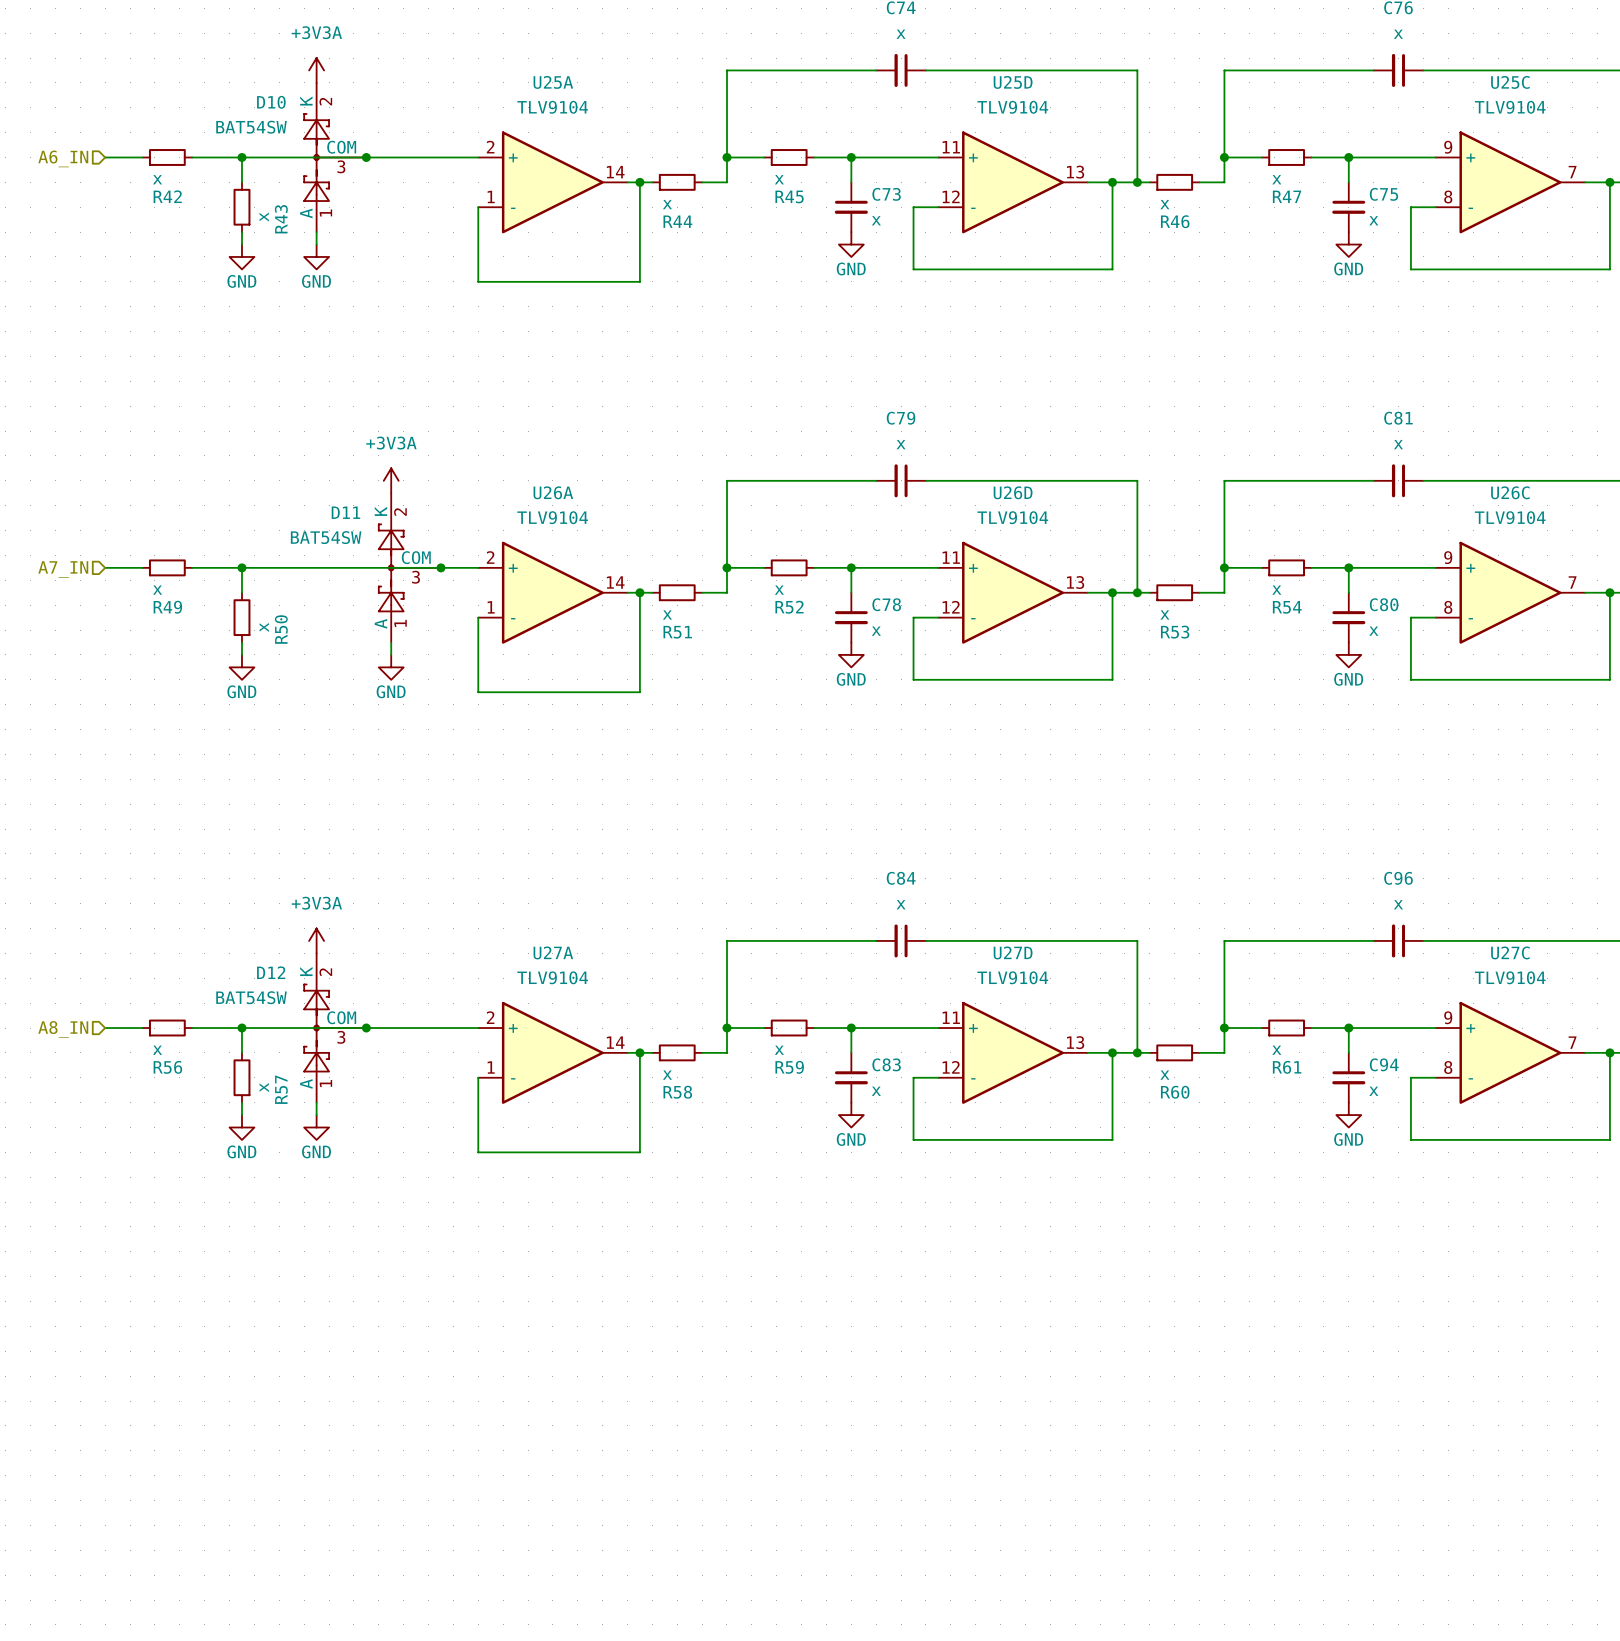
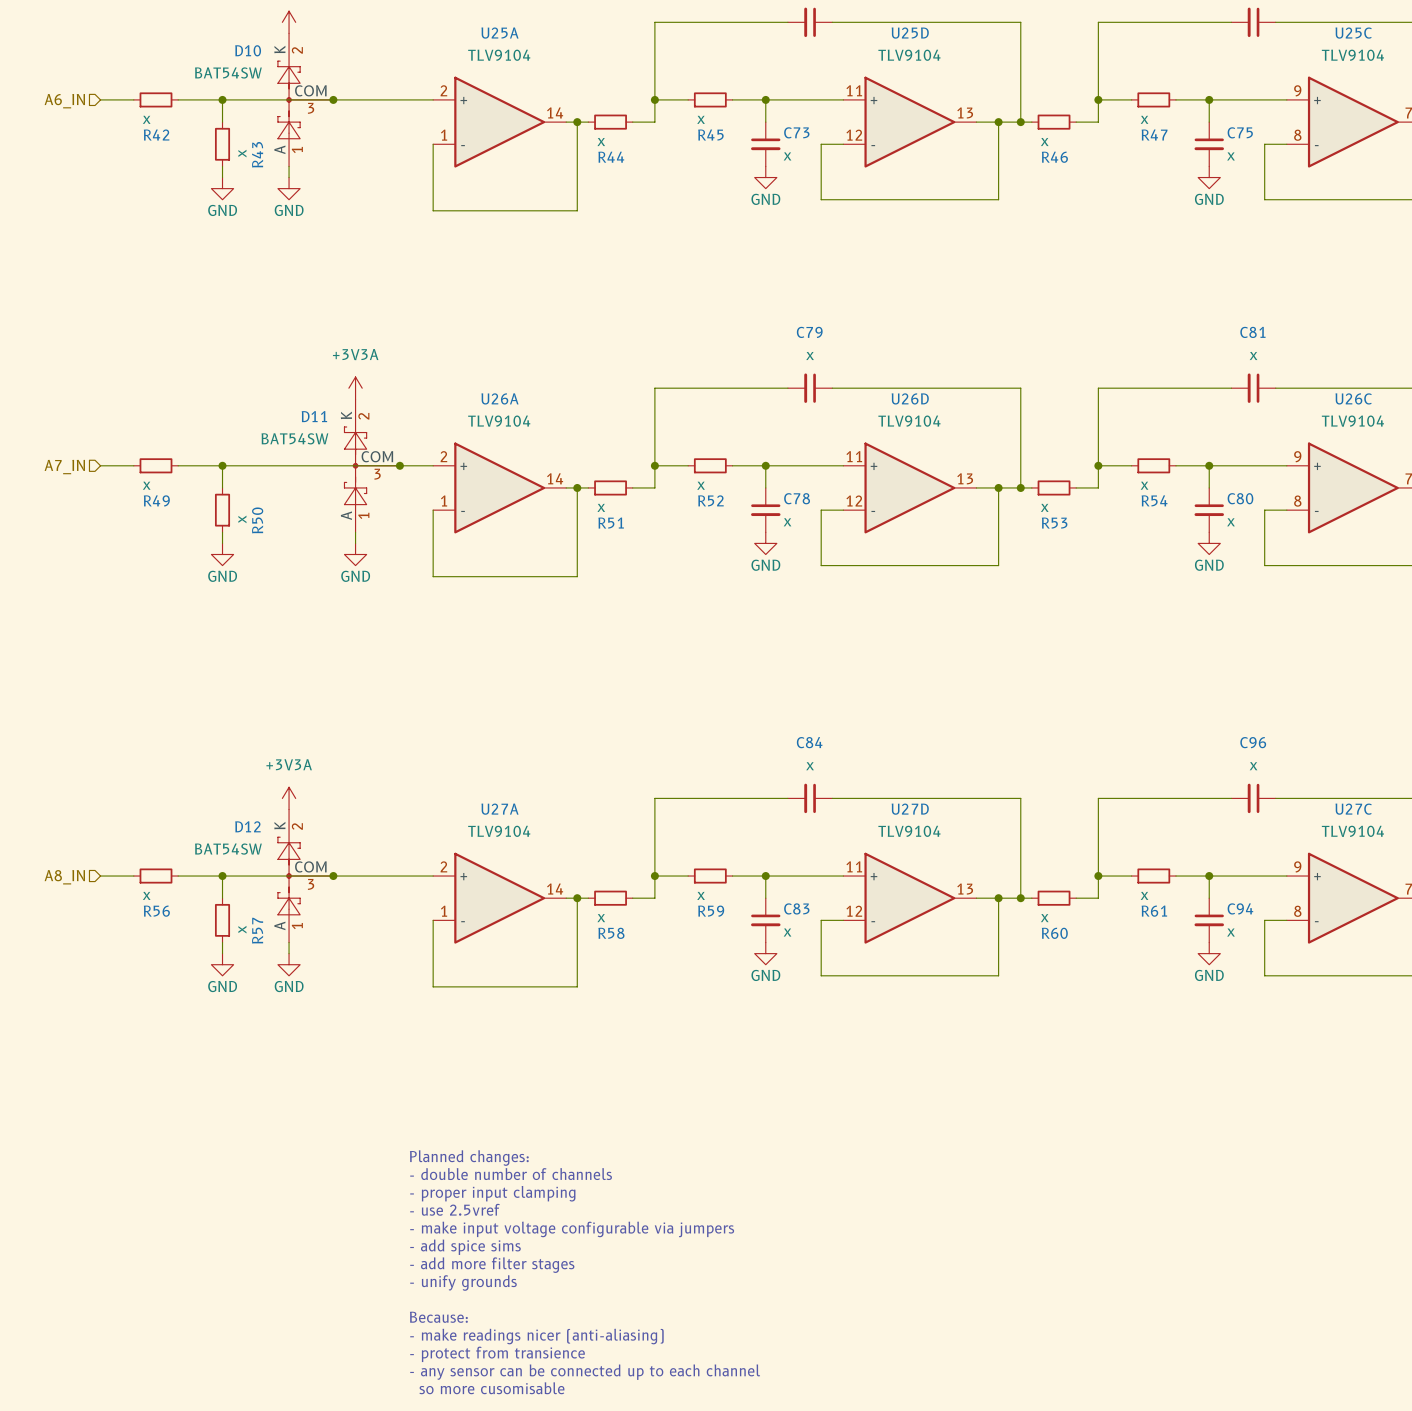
text: none -> Planned changes: (469, 1158)
text: none -> - double number of channels (511, 1174)
text: none -> - proper input clamping (492, 1193)
text: none -> - use 2.5vref (455, 1209)
text: none -> - make input voltage configurable via jumpers (572, 1229)
text: none -> - add spice sims (465, 1247)
text: none -> - add more filter stages (492, 1265)
text: none -> - unify grounds (463, 1282)
text: none -> Because: (438, 1317)
text: none -> - make readings nicer (anti-aliasing) (536, 1336)
text: none -> - protect from transience (497, 1354)
text: none -> - any sensor can be connected up to each channel (585, 1372)
text: none -> so more cusomisable (491, 1388)

